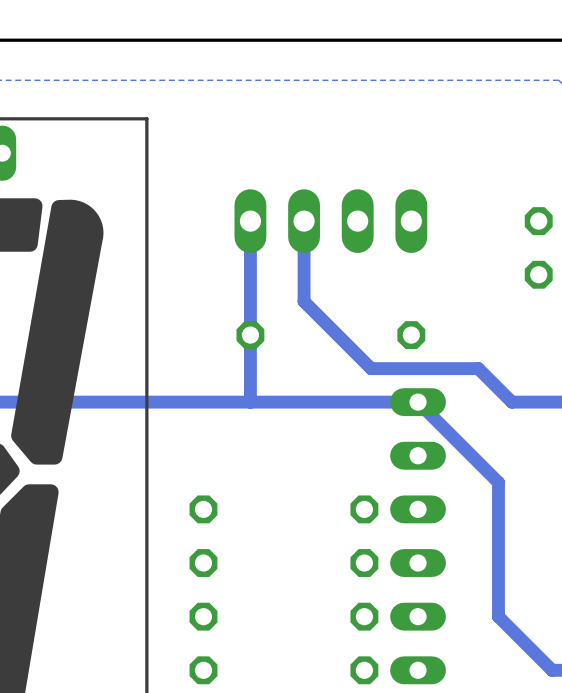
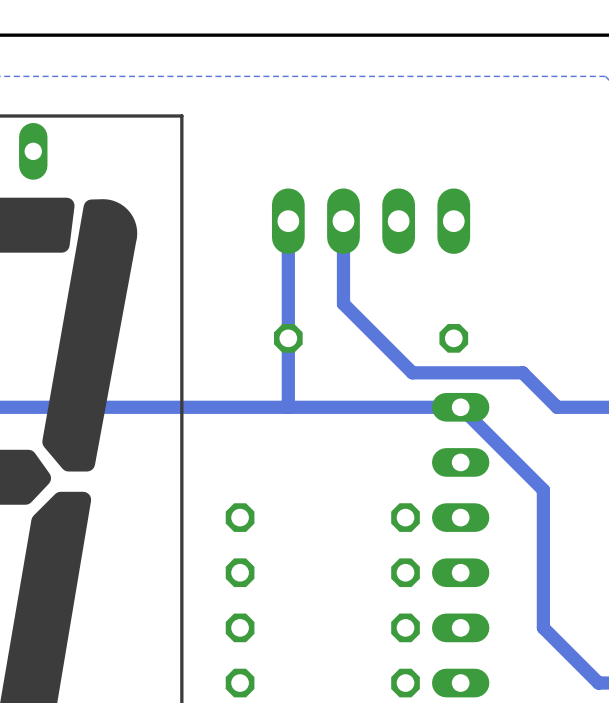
part: (538, 247) -> none

